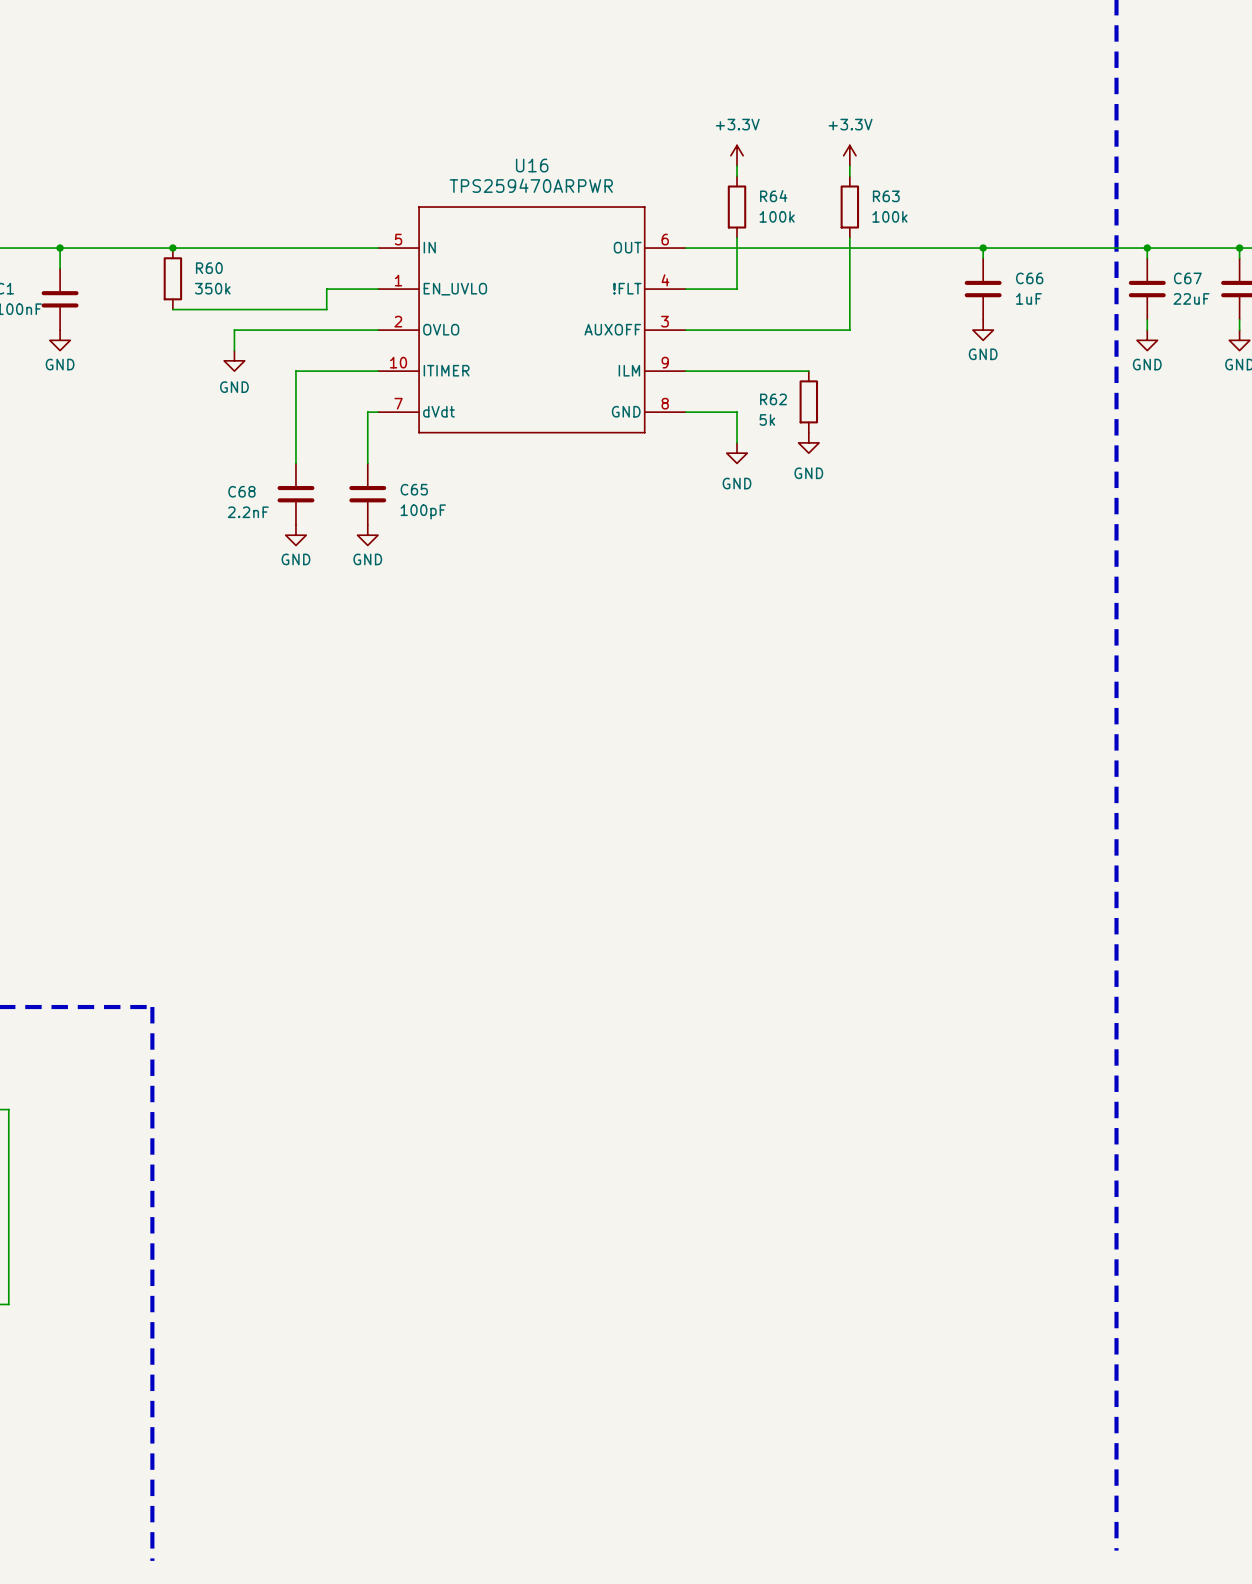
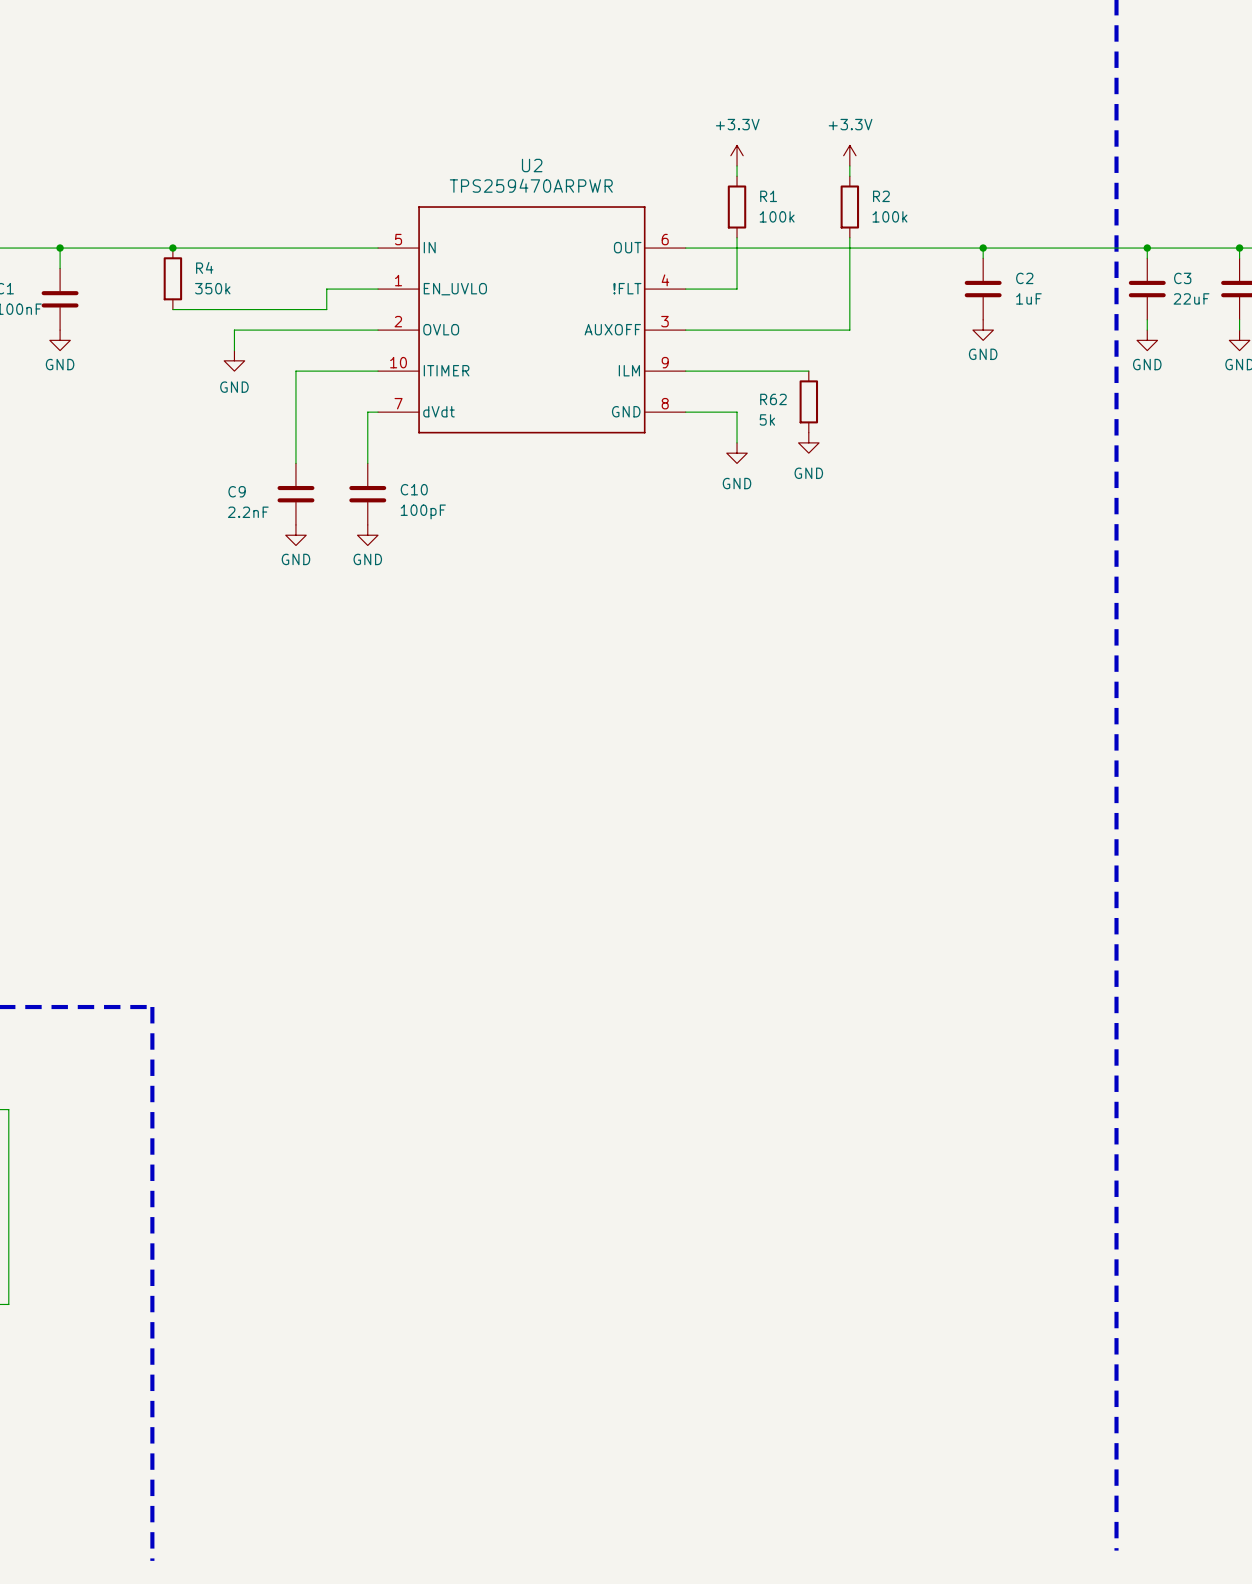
U16 name: U16 (532, 165) -> U2 (532, 165)
R64 name: R64 (773, 196) -> R1 (768, 196)
R63 name: R63 (886, 196) -> R2 (881, 196)
R60 name: R60 (209, 268) -> R4 (204, 267)
C66 name: C66 (1029, 278) -> C2 (1024, 278)
C67 name: C67 (1187, 278) -> C3 (1182, 278)
C65 name: C65 (414, 489) -> C10 (414, 489)
C68 name: C68 (241, 491) -> C9 (237, 491)

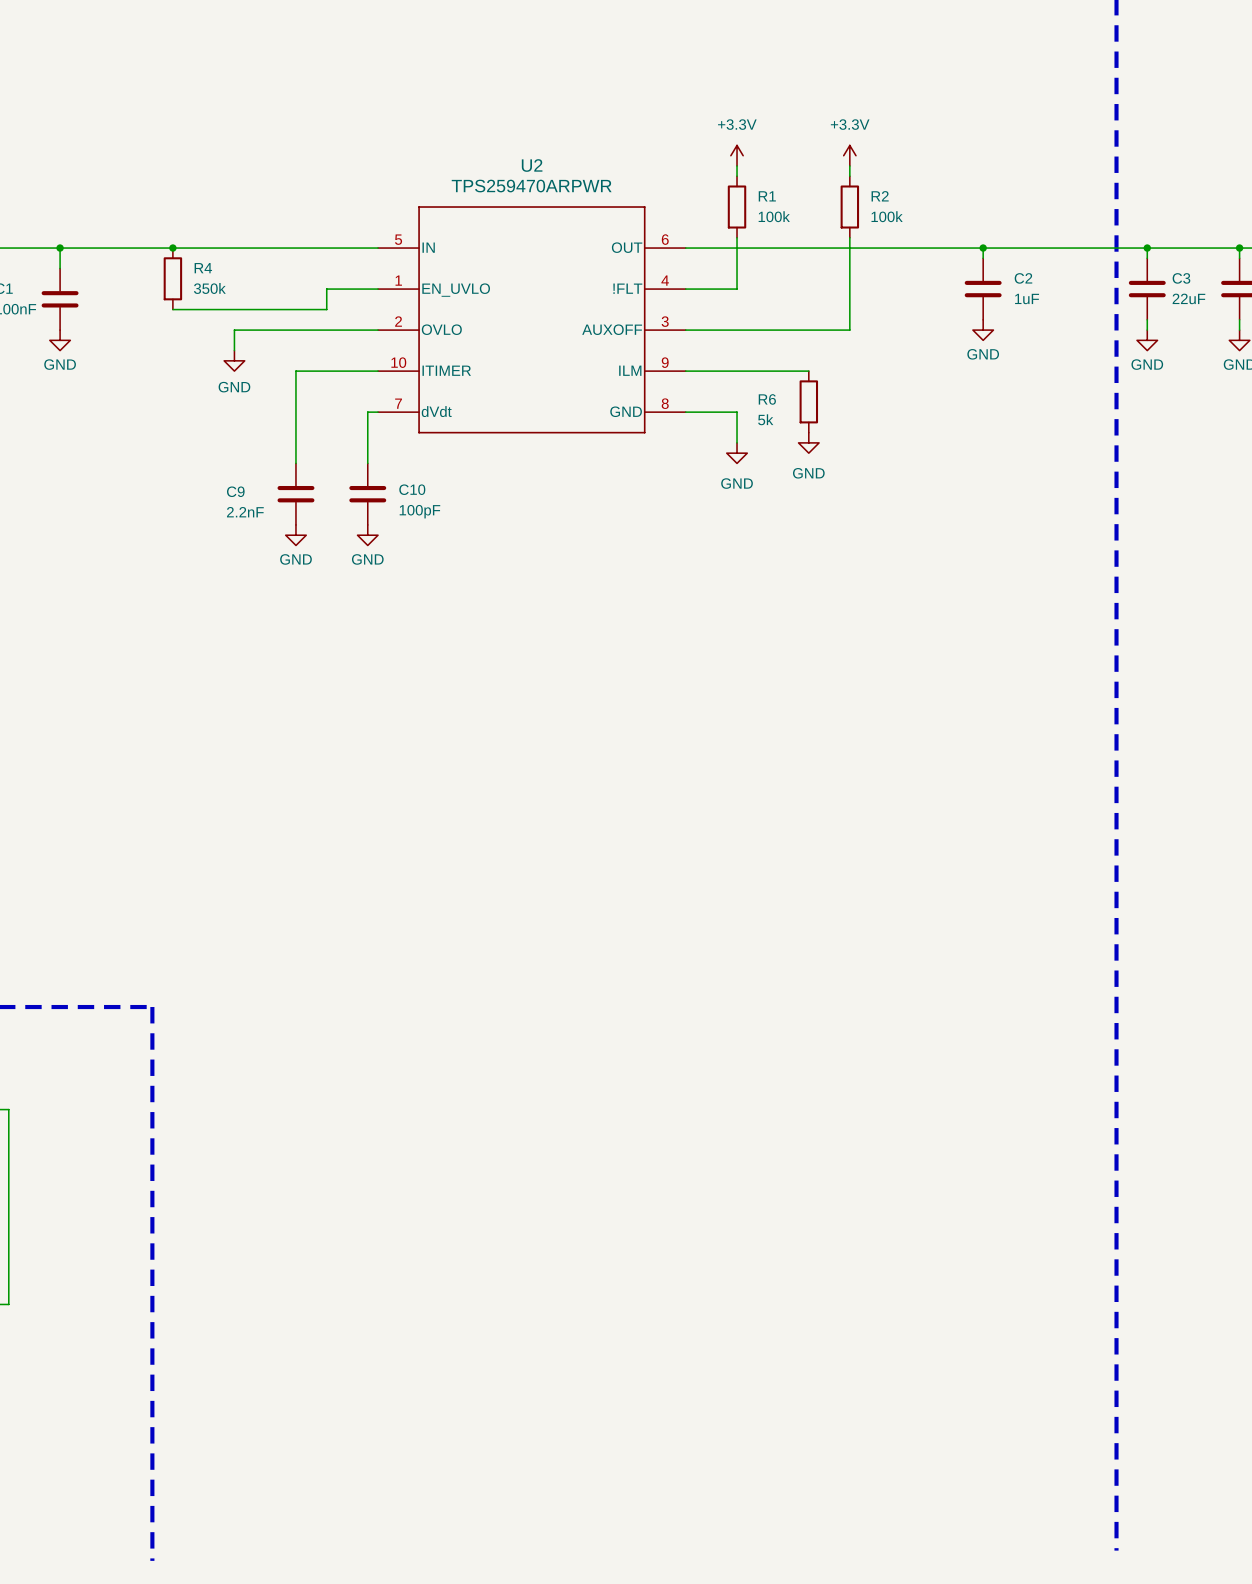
R62 name: R62 (773, 399) -> R6 (767, 399)

